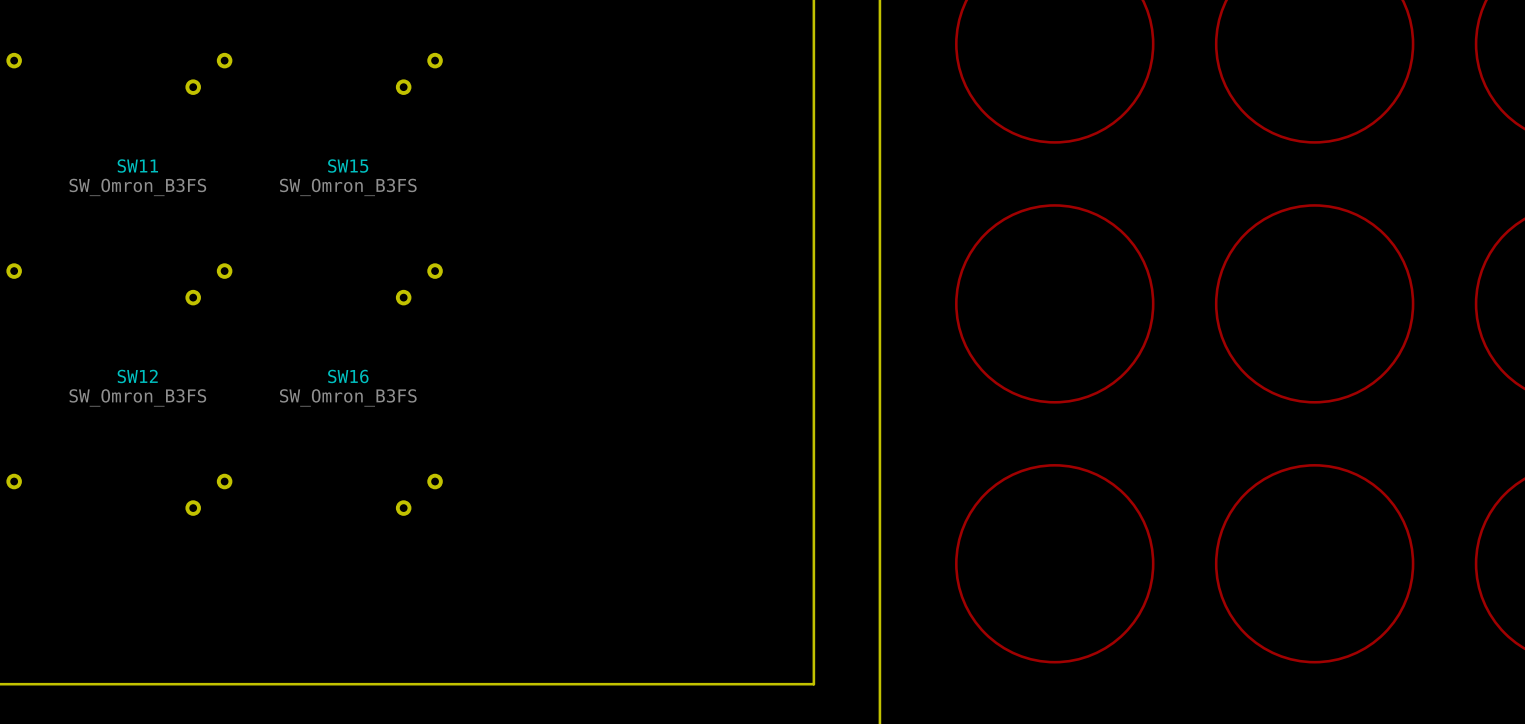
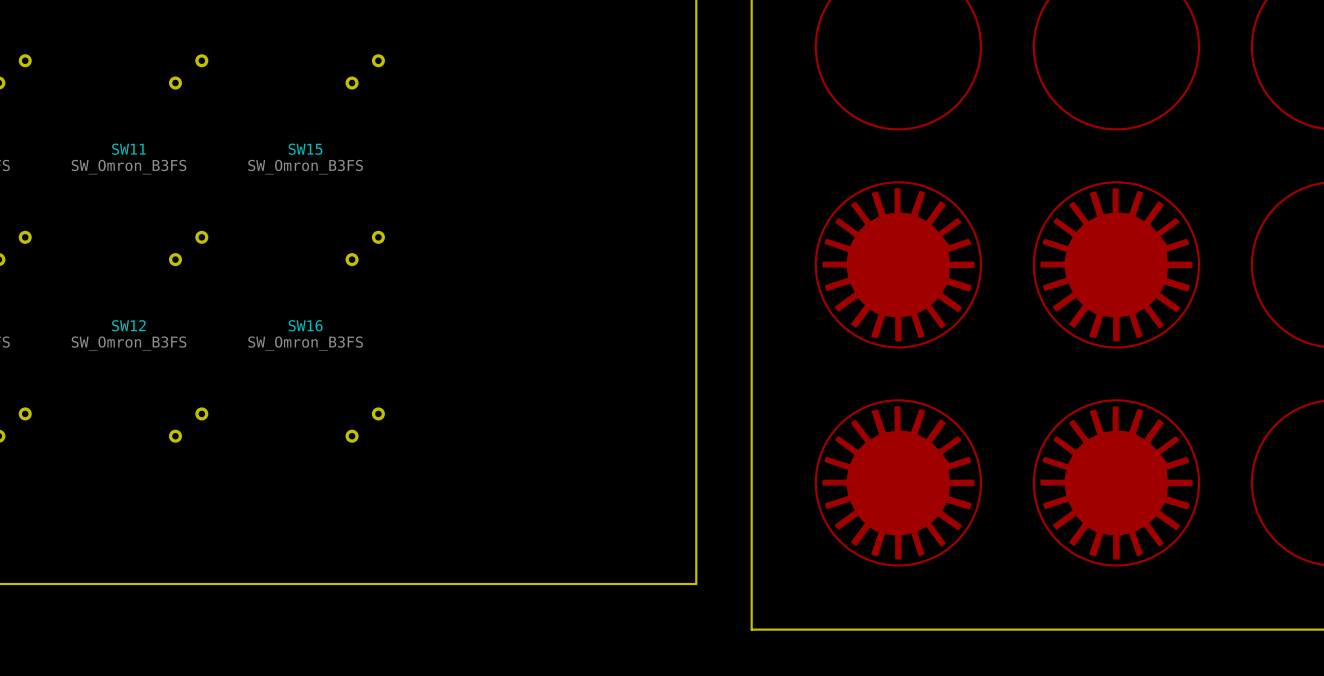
drawing: none -> [822, 188, 975, 342]
drawing: none -> [1040, 188, 1193, 342]
drawing: none -> [822, 406, 975, 560]
drawing: none -> [1040, 406, 1193, 560]

